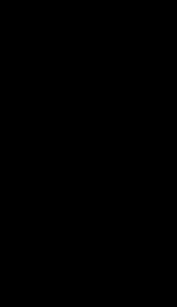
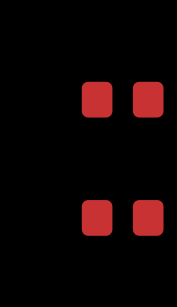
part: none -> (122, 99)
part: none -> (122, 217)

